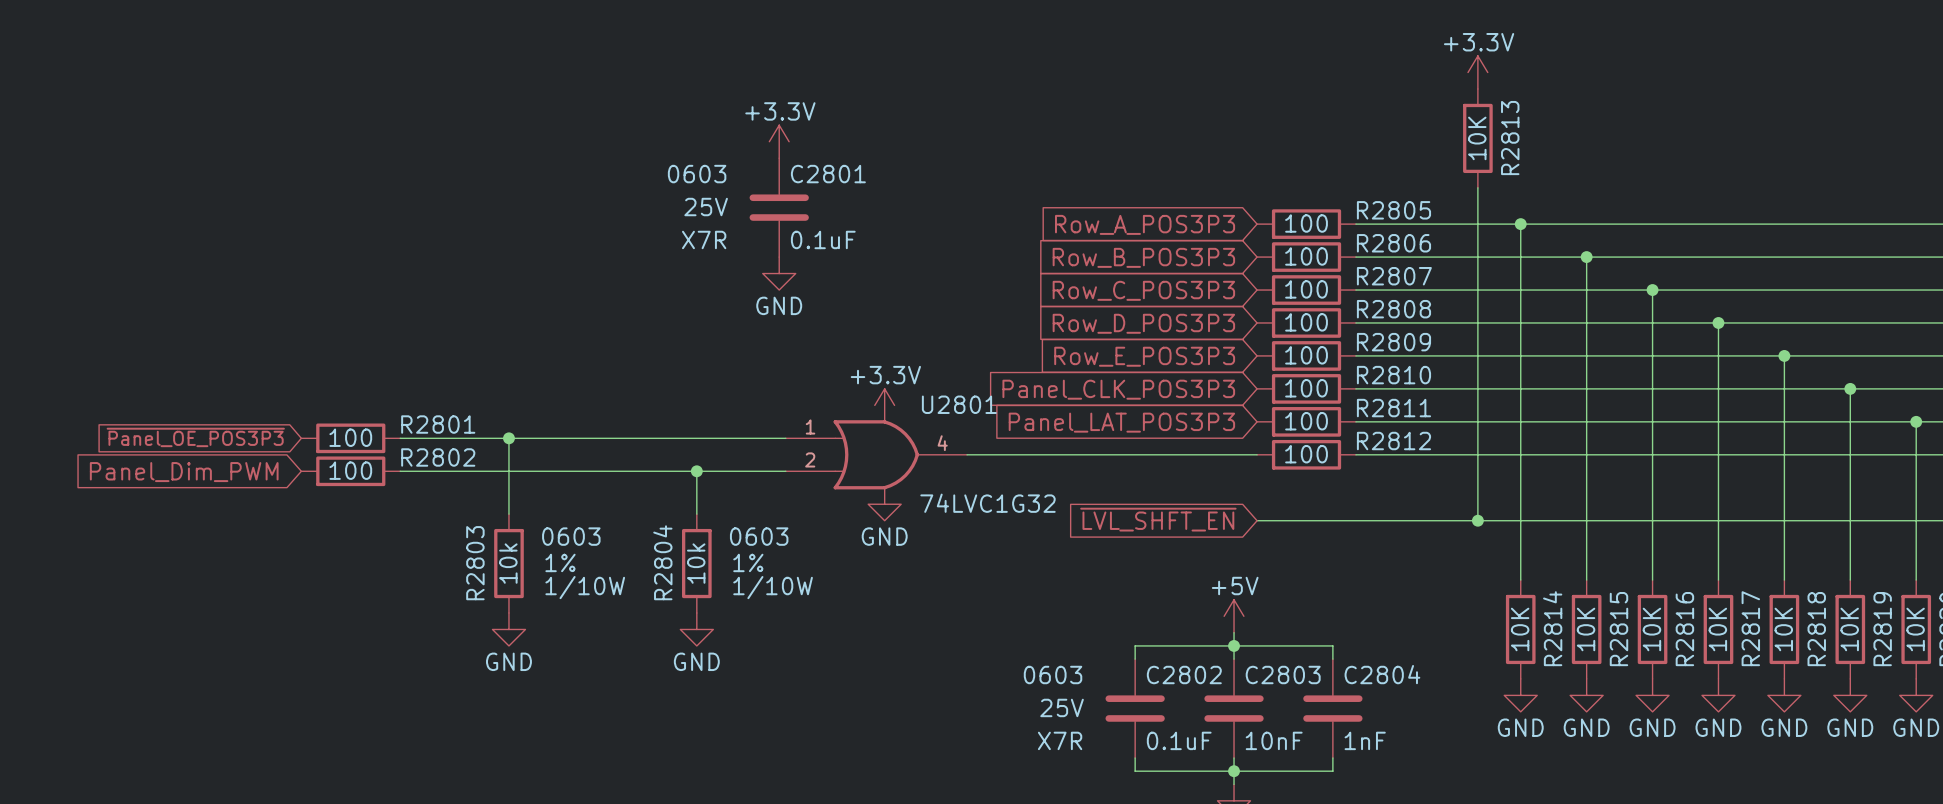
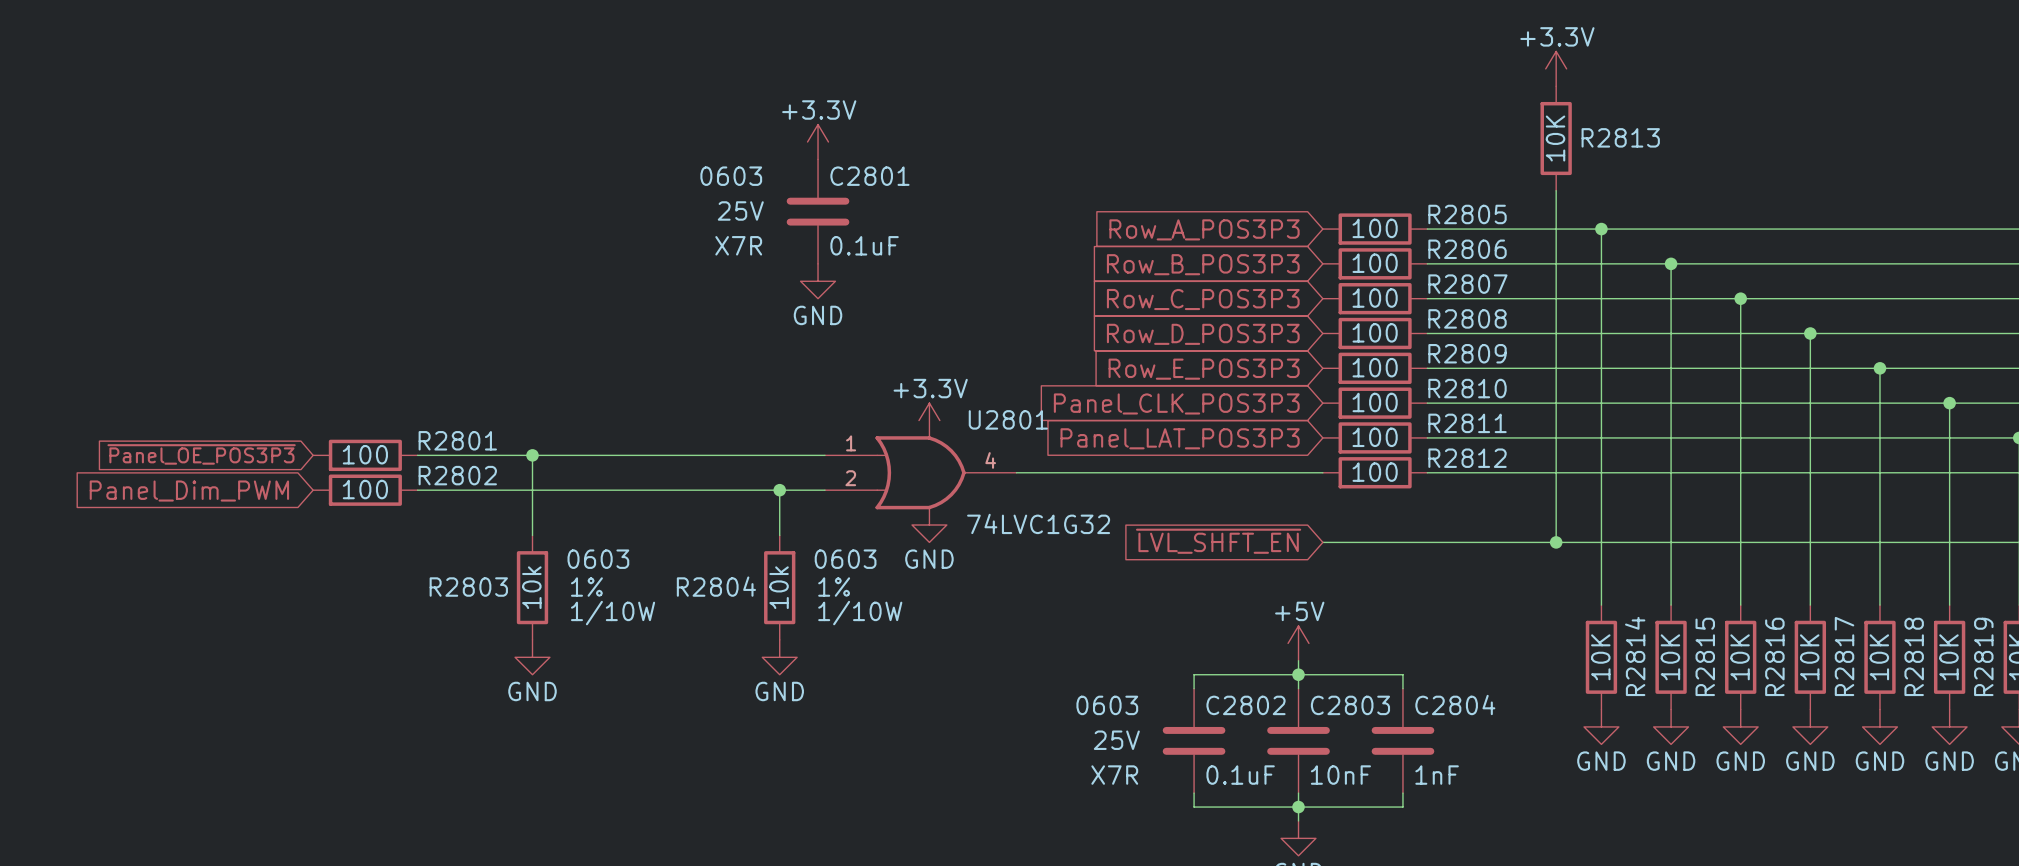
R2813 name rotation: 0° (1510, 138) -> 90° clockwise (1620, 137)
wire: (696, 471) (696, 514) -> (779, 490) (779, 535)
junction position: (696, 471) -> (779, 490)
R2804 name rotation: 0° (662, 562) -> 90° clockwise (716, 586)
R2803 name rotation: 0° (475, 563) -> 90° clockwise (468, 587)
R2804 position: (696, 563) -> (779, 587)
power symbol position: GND (696, 629) -> GND (779, 657)

